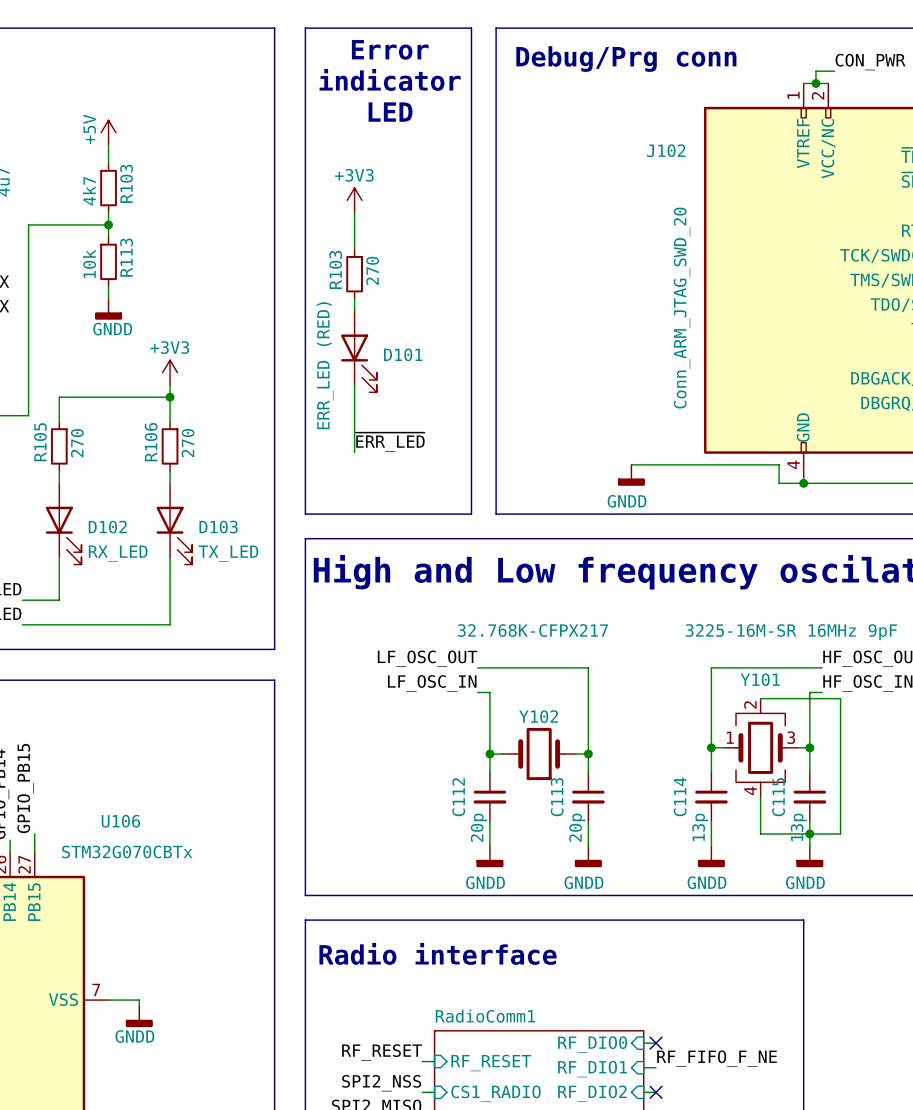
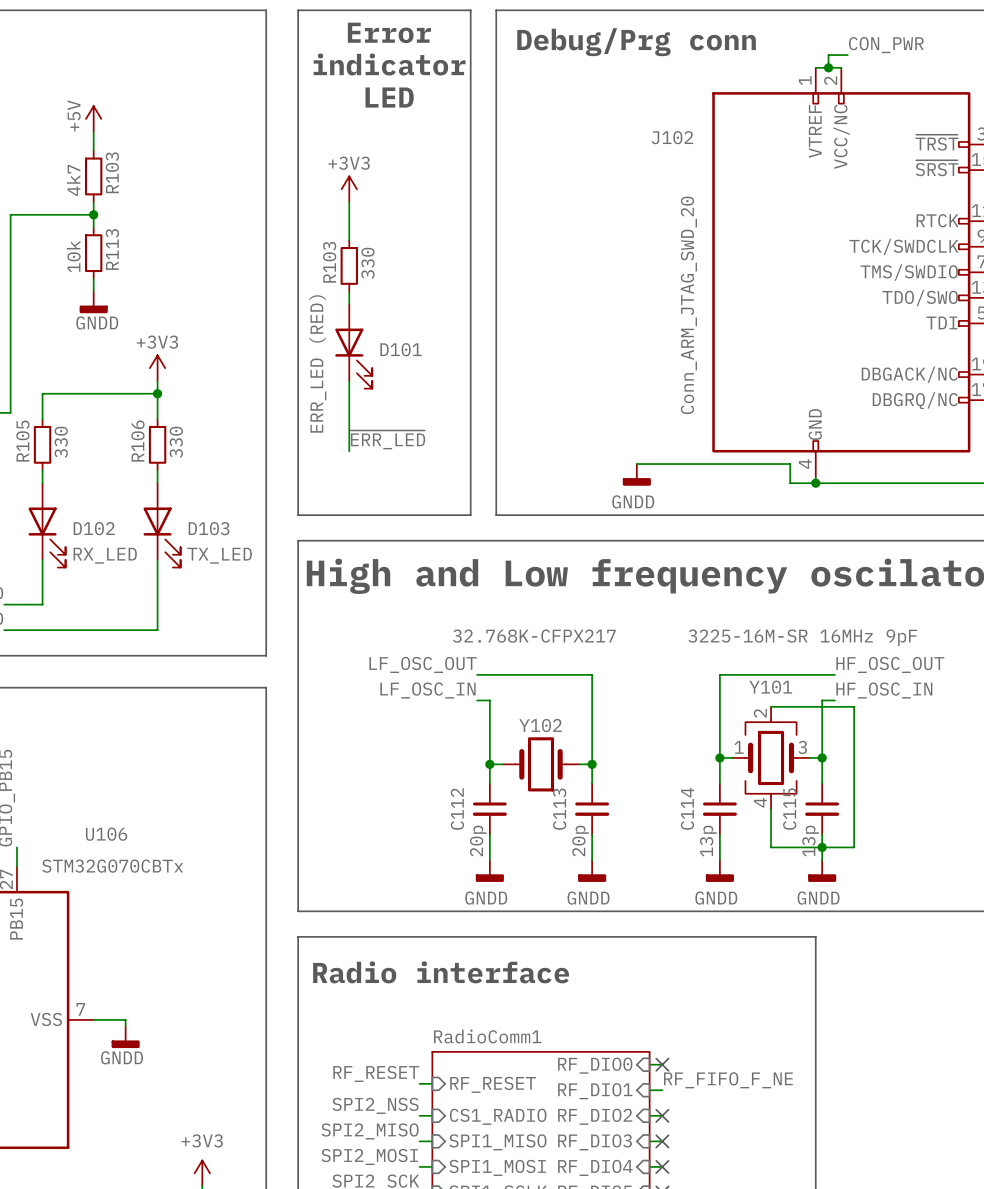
R103 value: 270 (372, 270) -> 330 (367, 263)
R105 value: 270 (77, 443) -> 330 (61, 442)
R106 value: 270 (188, 443) -> 330 (176, 442)

